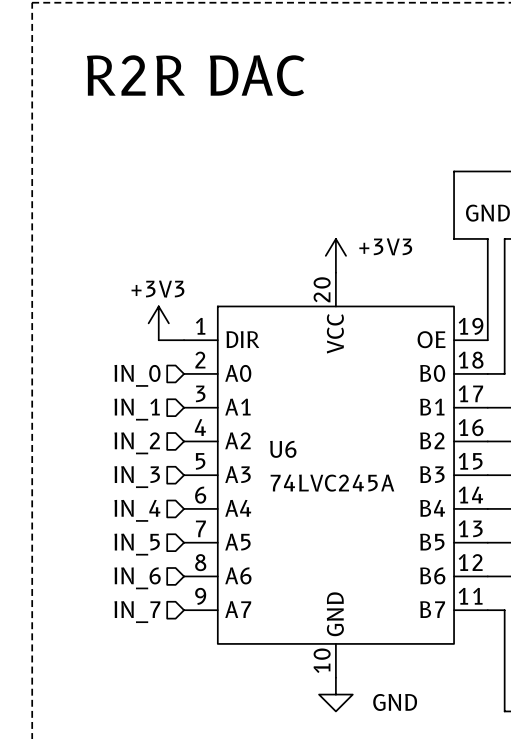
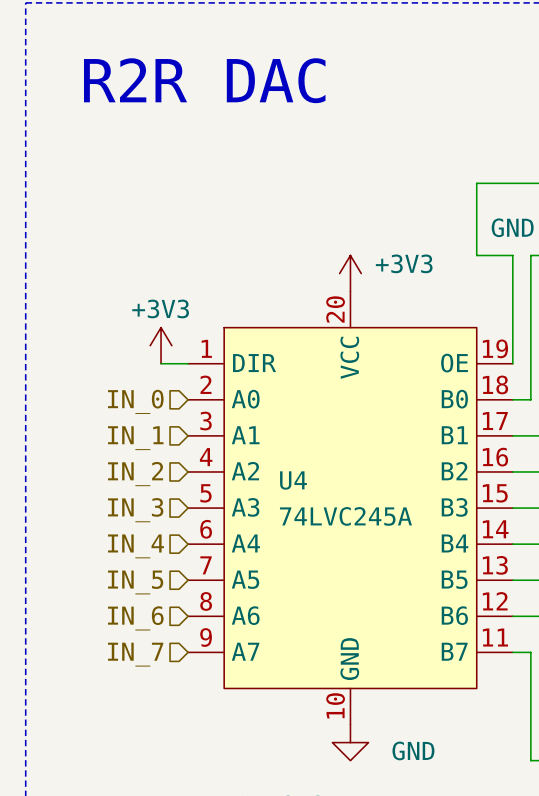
U6 name: U6 (283, 449) -> U4 (293, 480)

